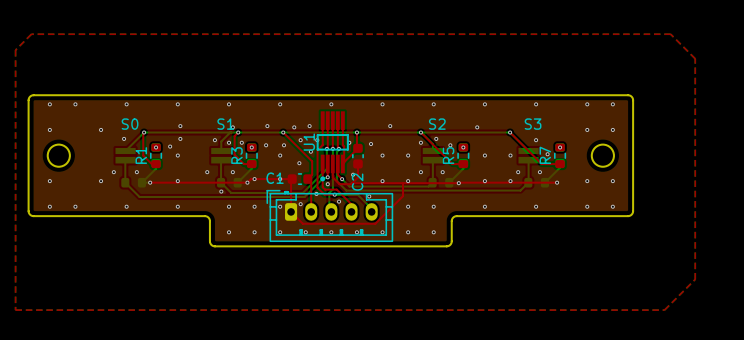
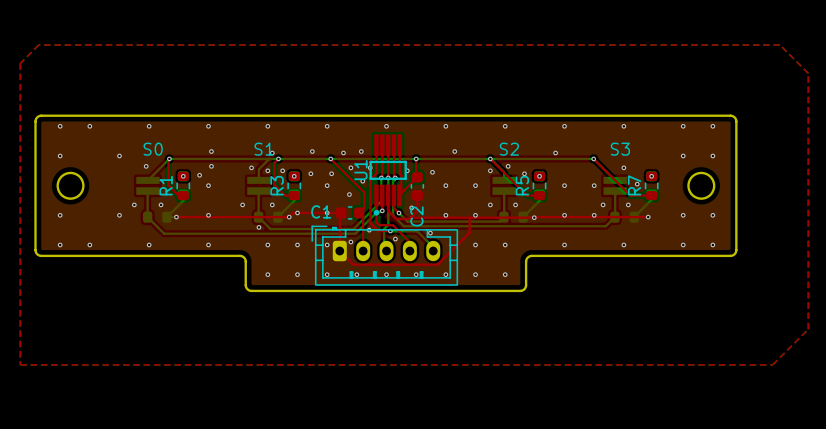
via: (327, 184) -> none

